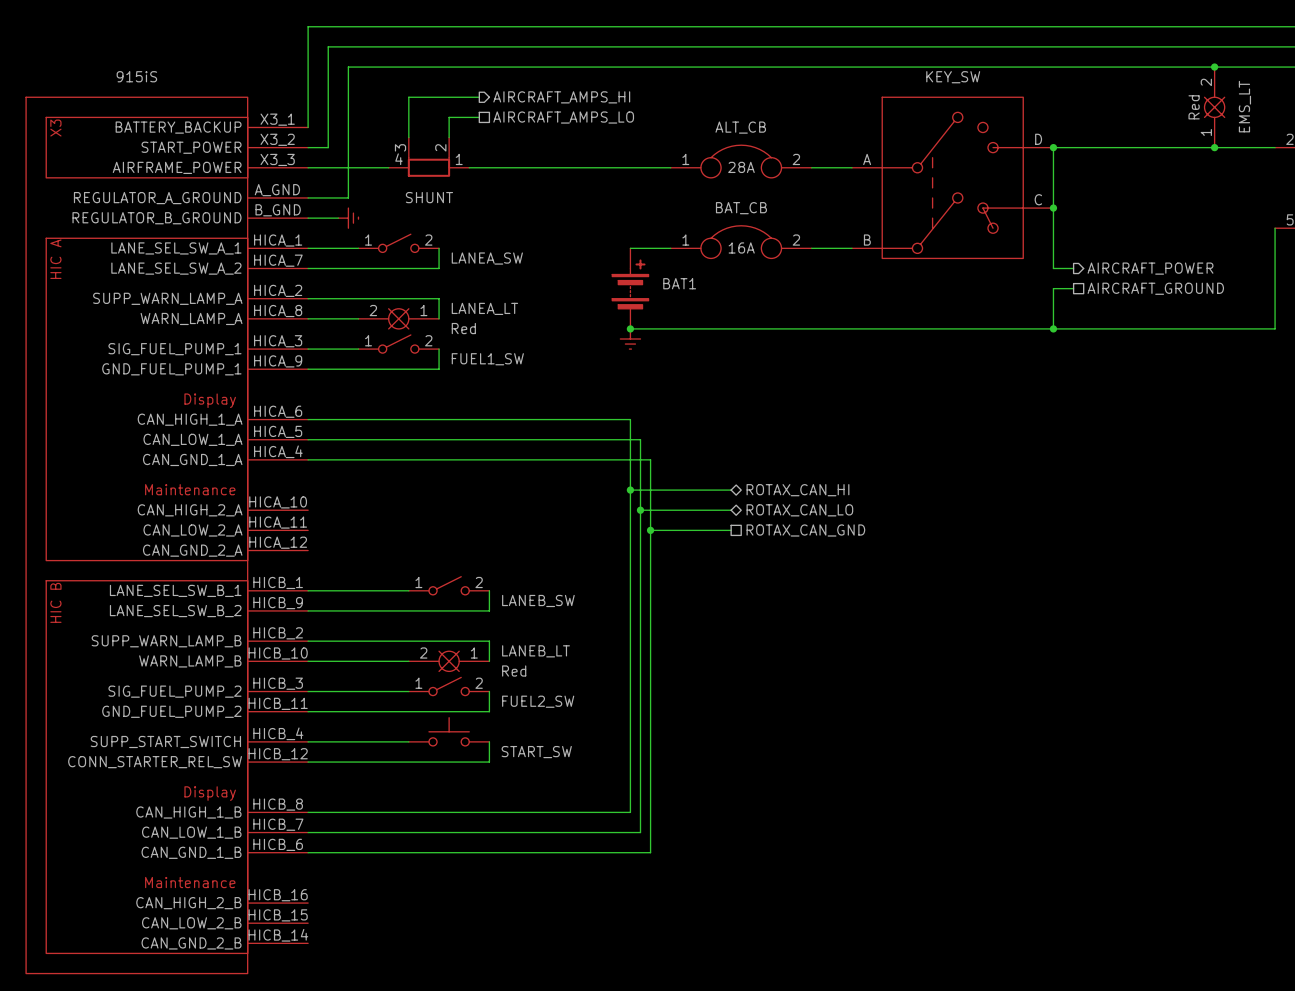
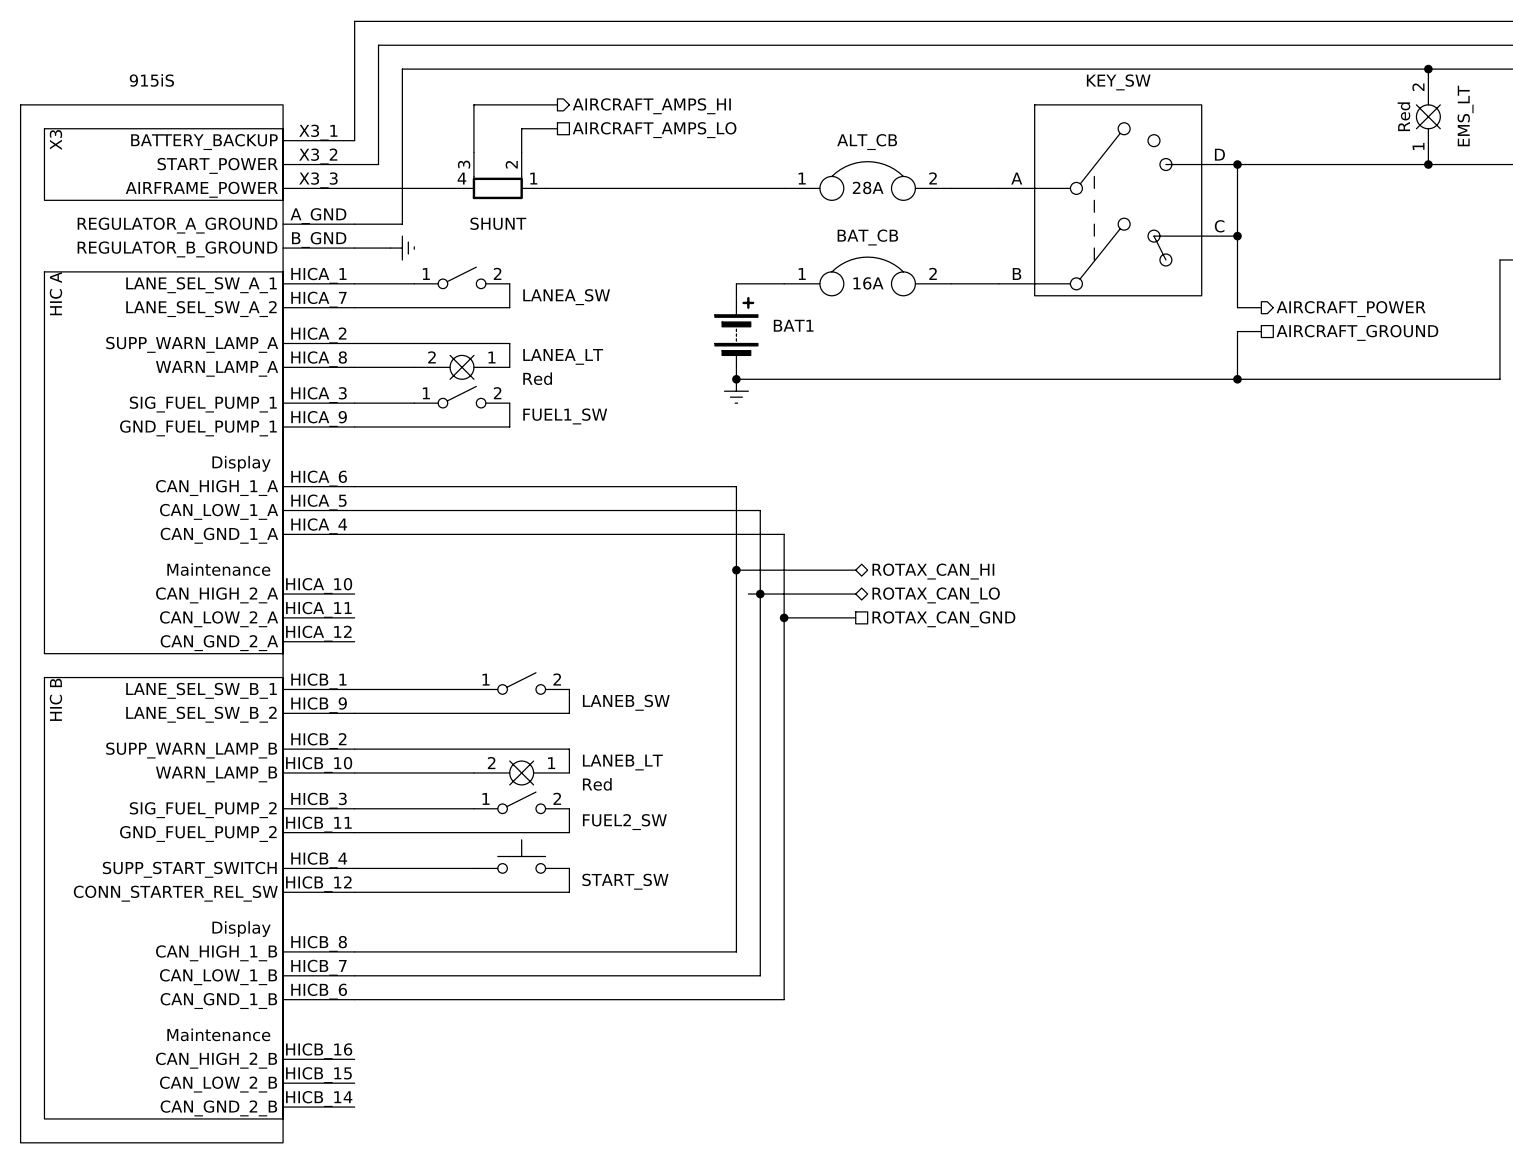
wire: (640, 439) (640, 832) -> (748, 510) (760, 510) (760, 534) (784, 534) (784, 999) (760, 999)
junction: (640, 510) -> none
junction: none -> (760, 594)
wire: (650, 530) (670, 530) -> none
junction: (650, 530) -> none
junction: none -> (784, 617)
wire: (650, 832) (650, 852) -> (760, 975) (748, 975)

